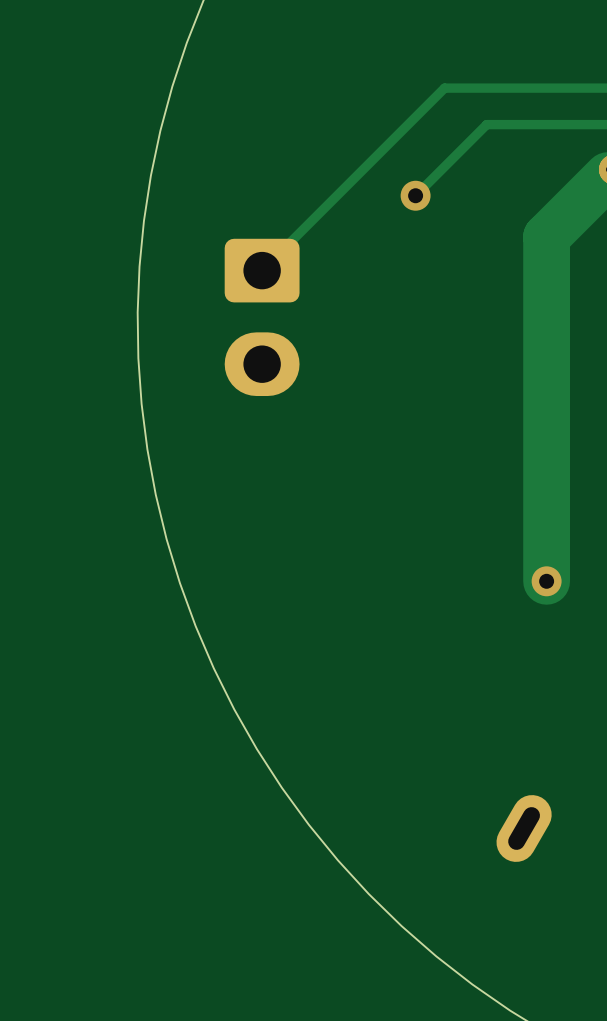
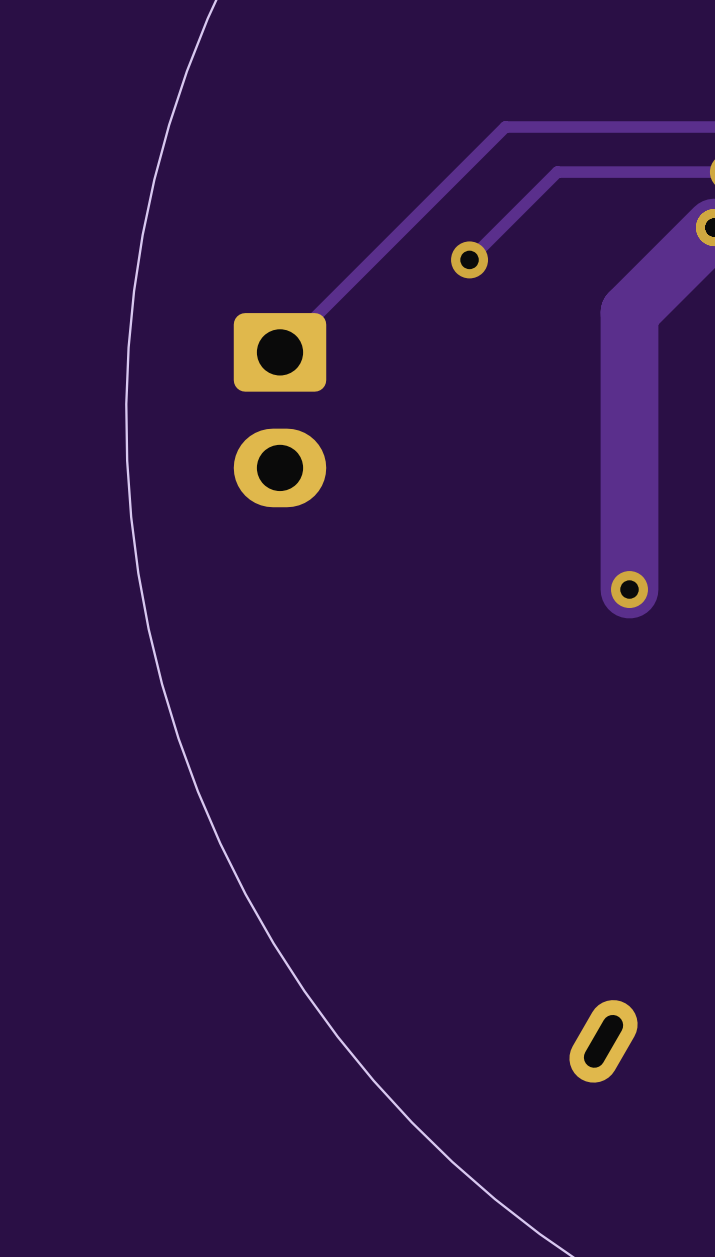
track: (546, 236) (546, 581) -> (631, 310) (629, 312) (629, 589)
via position: (546, 581) -> (629, 589)

